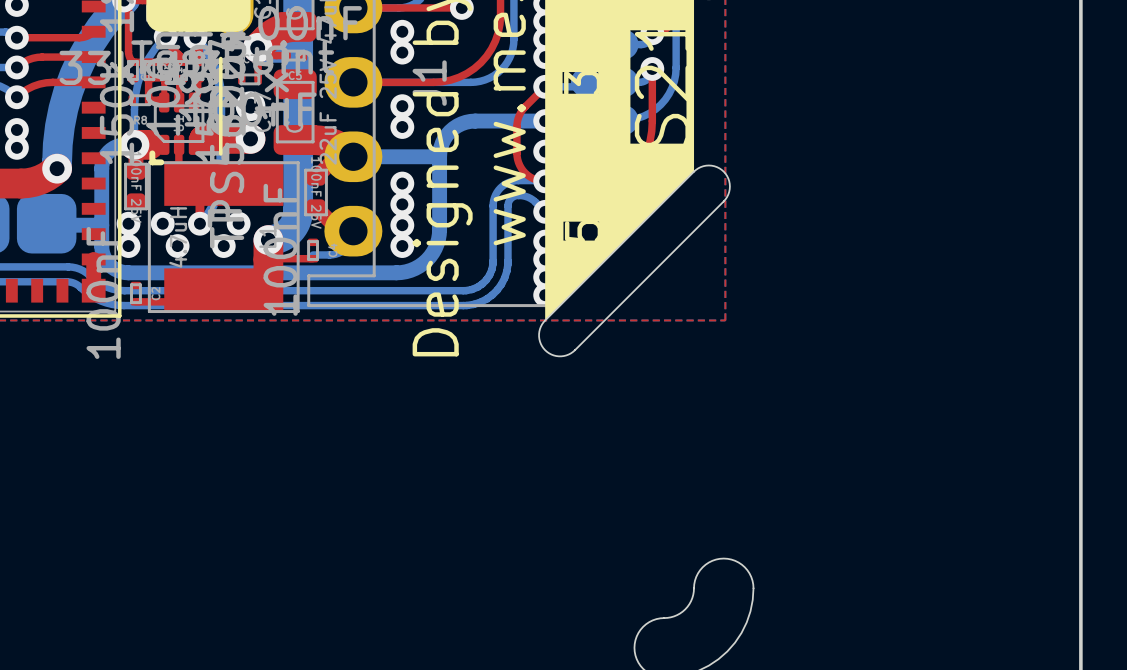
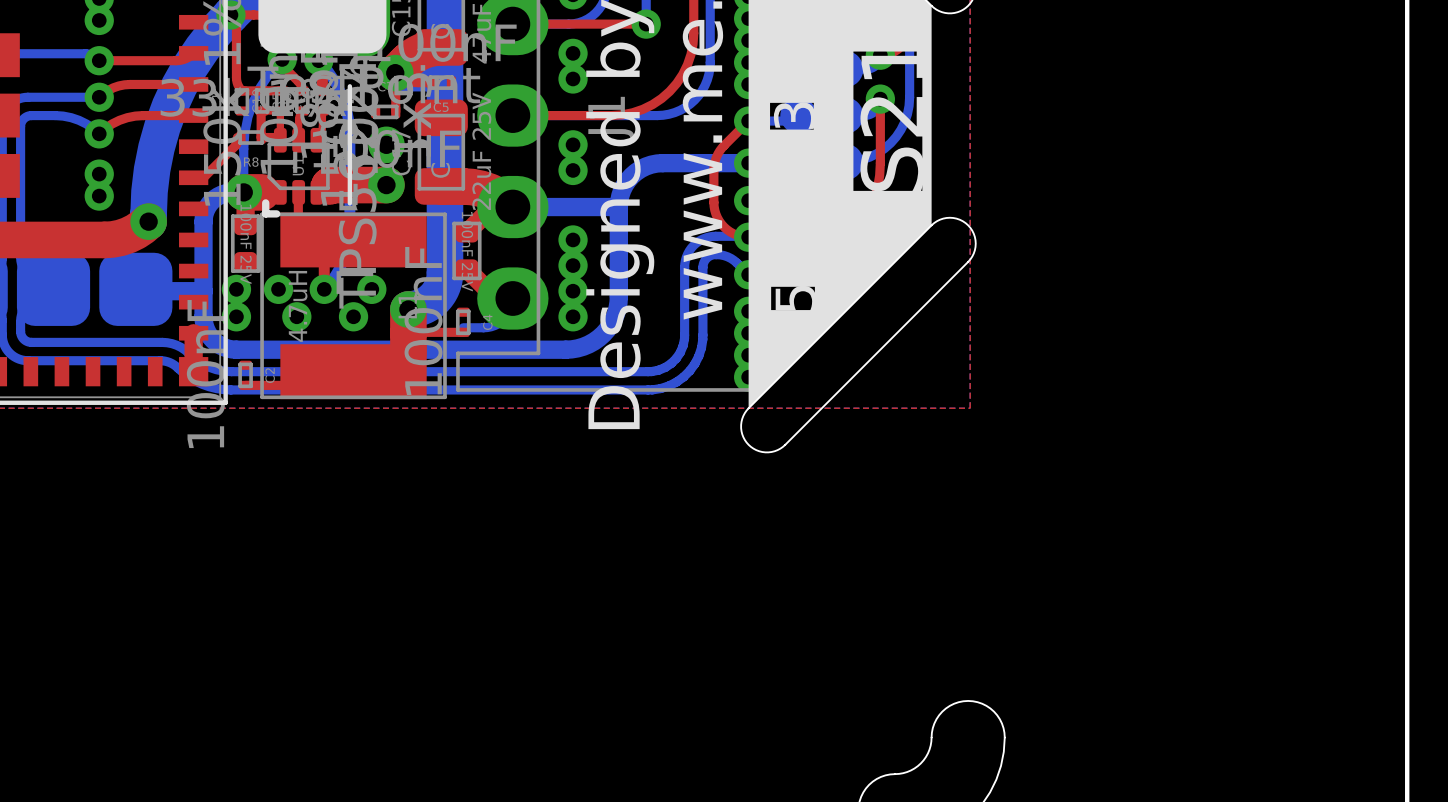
top track: none -> (237, 137) (236, 145) (203, 177)

